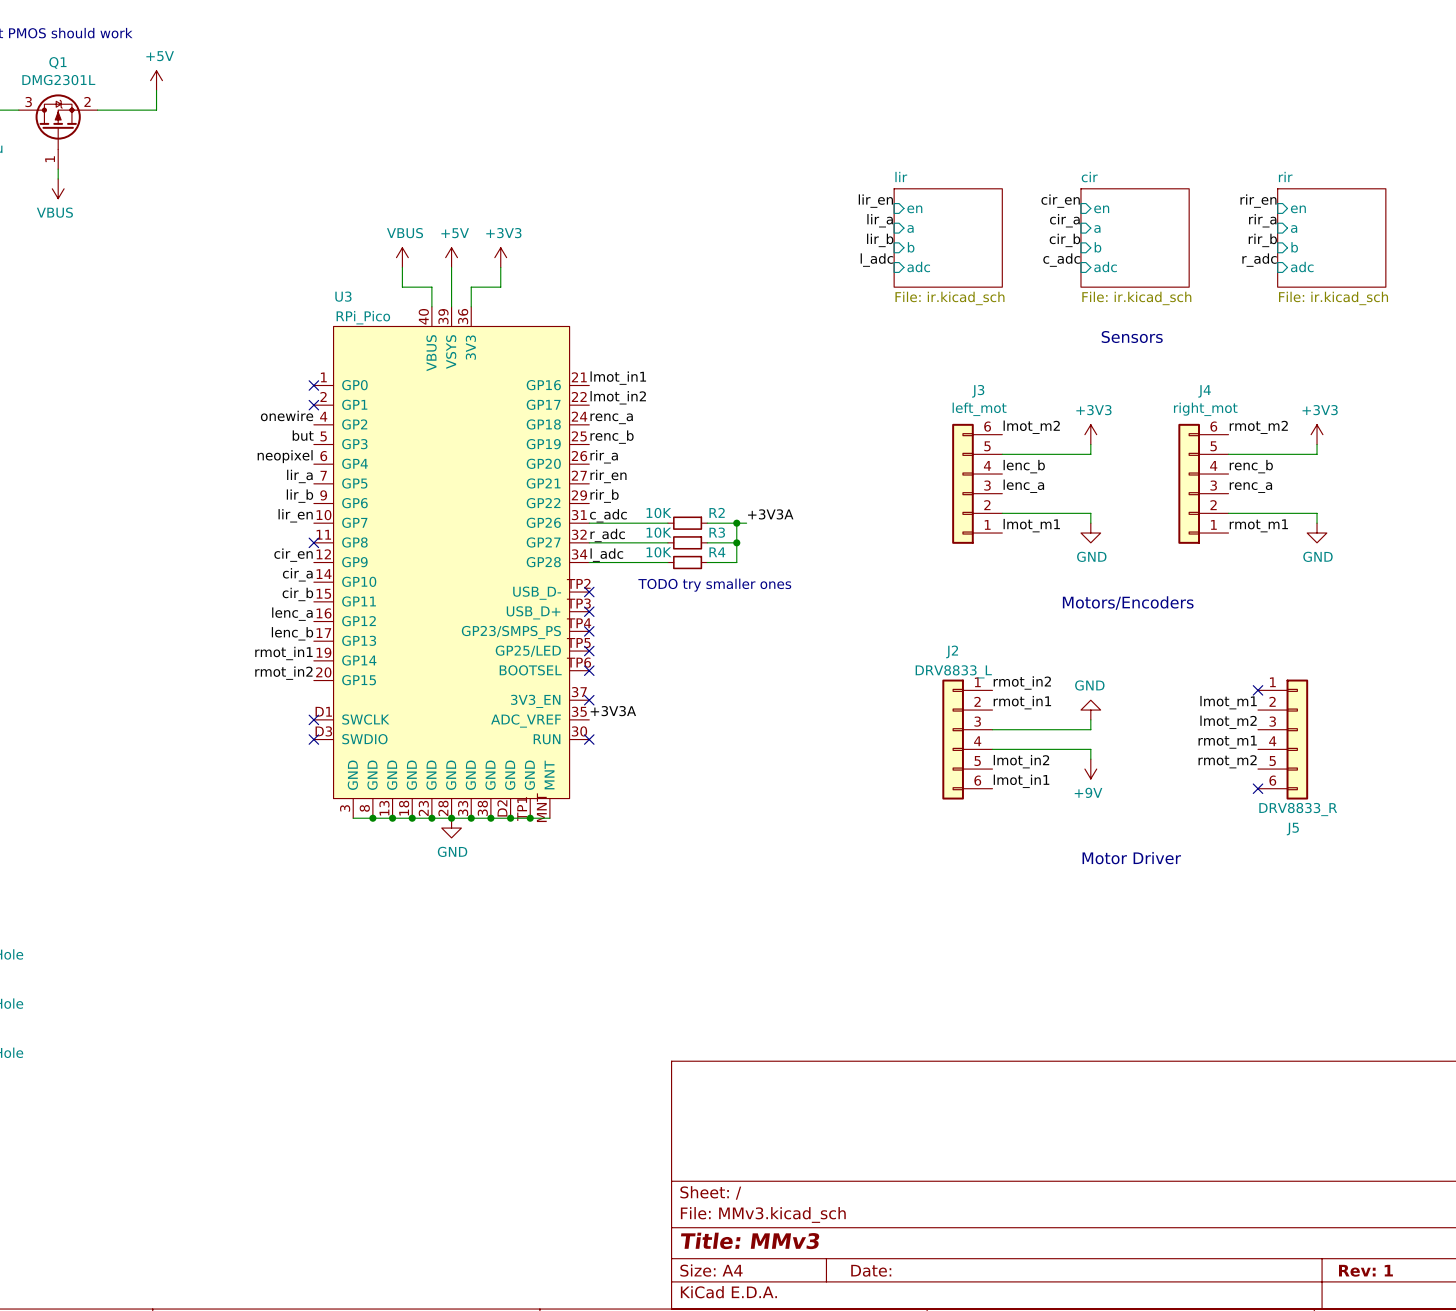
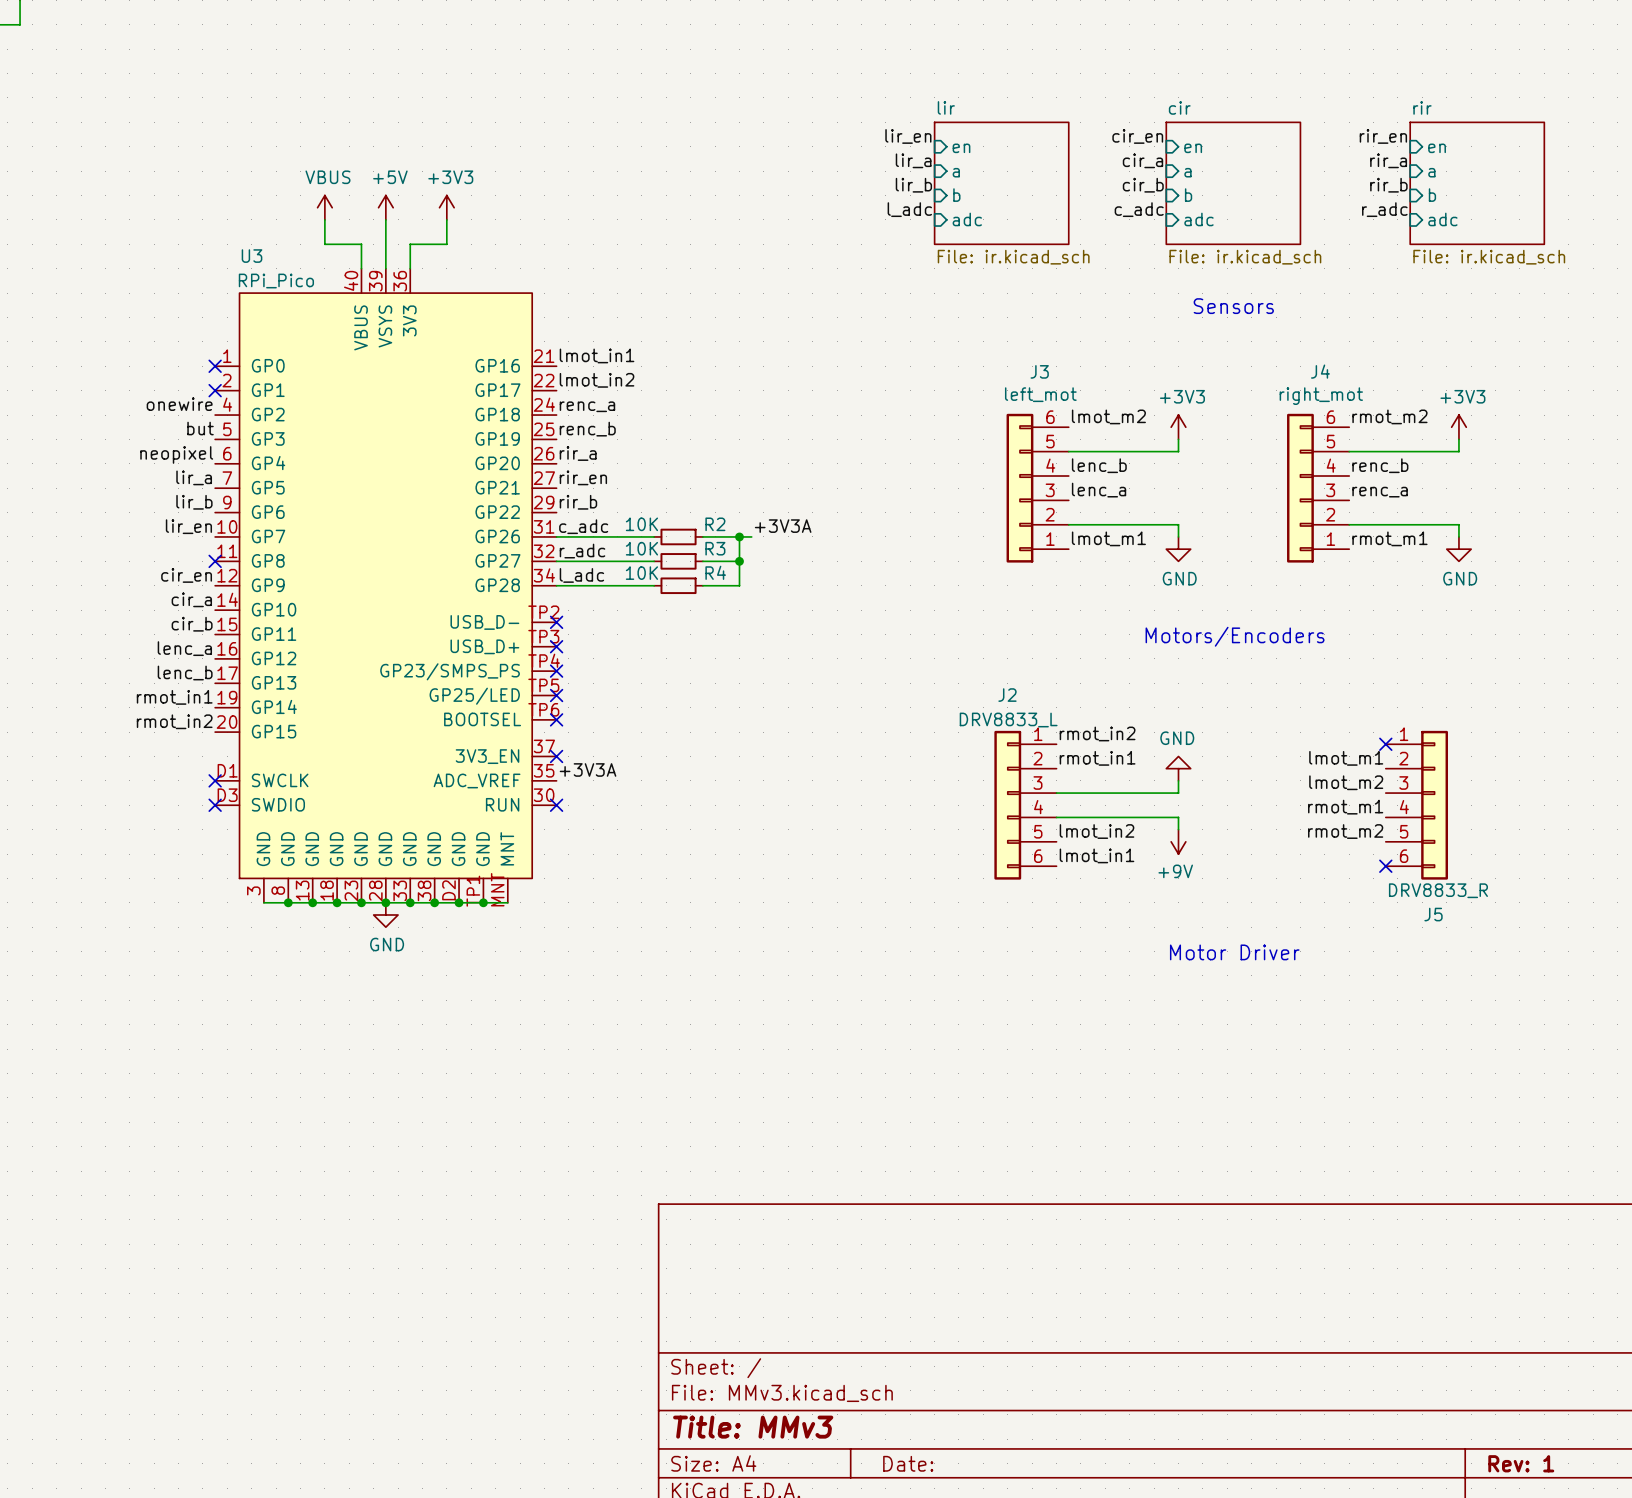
text: TODO try smaller ones (714, 585) -> none

